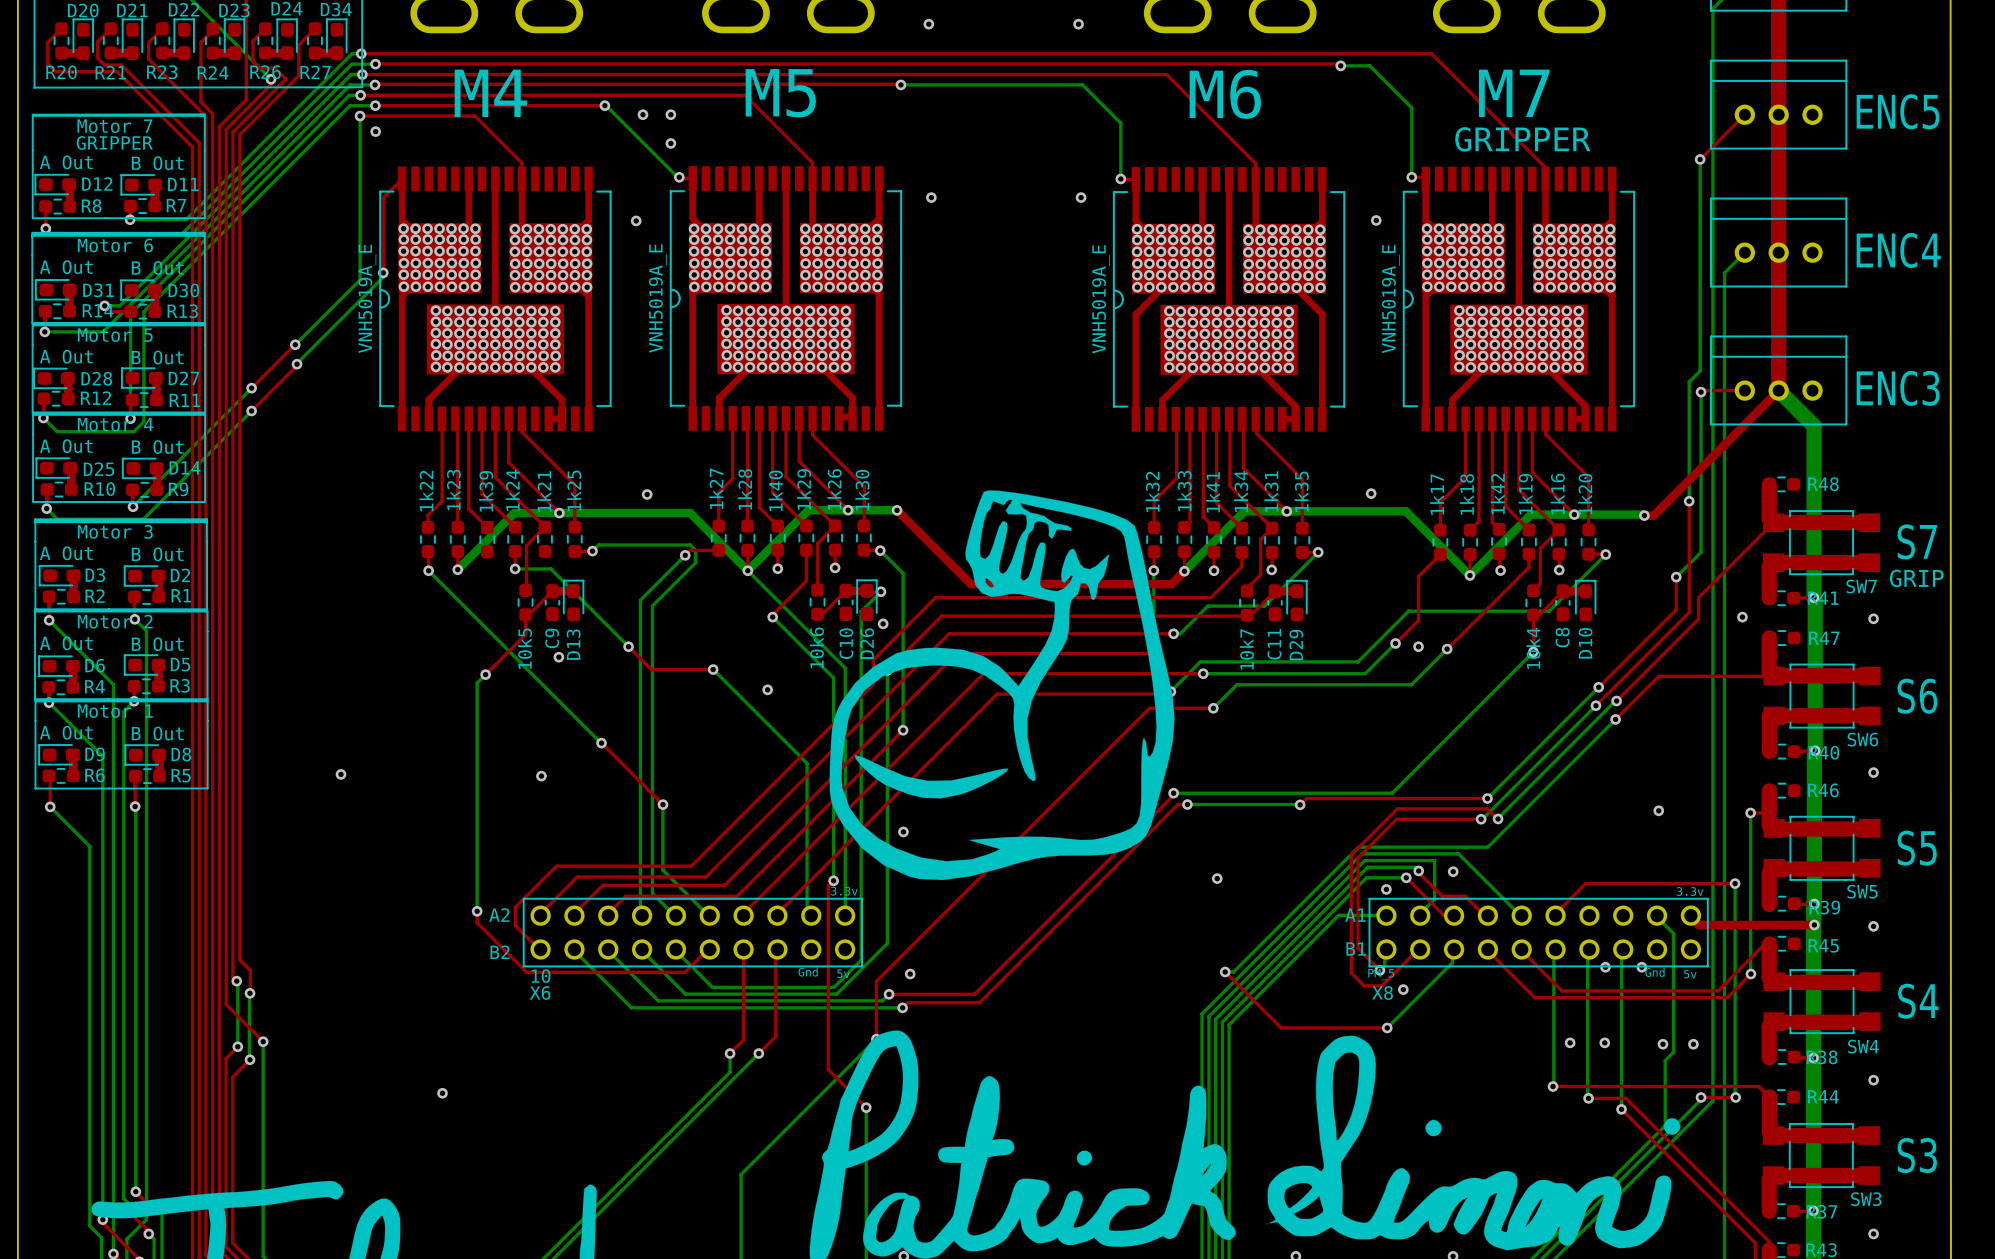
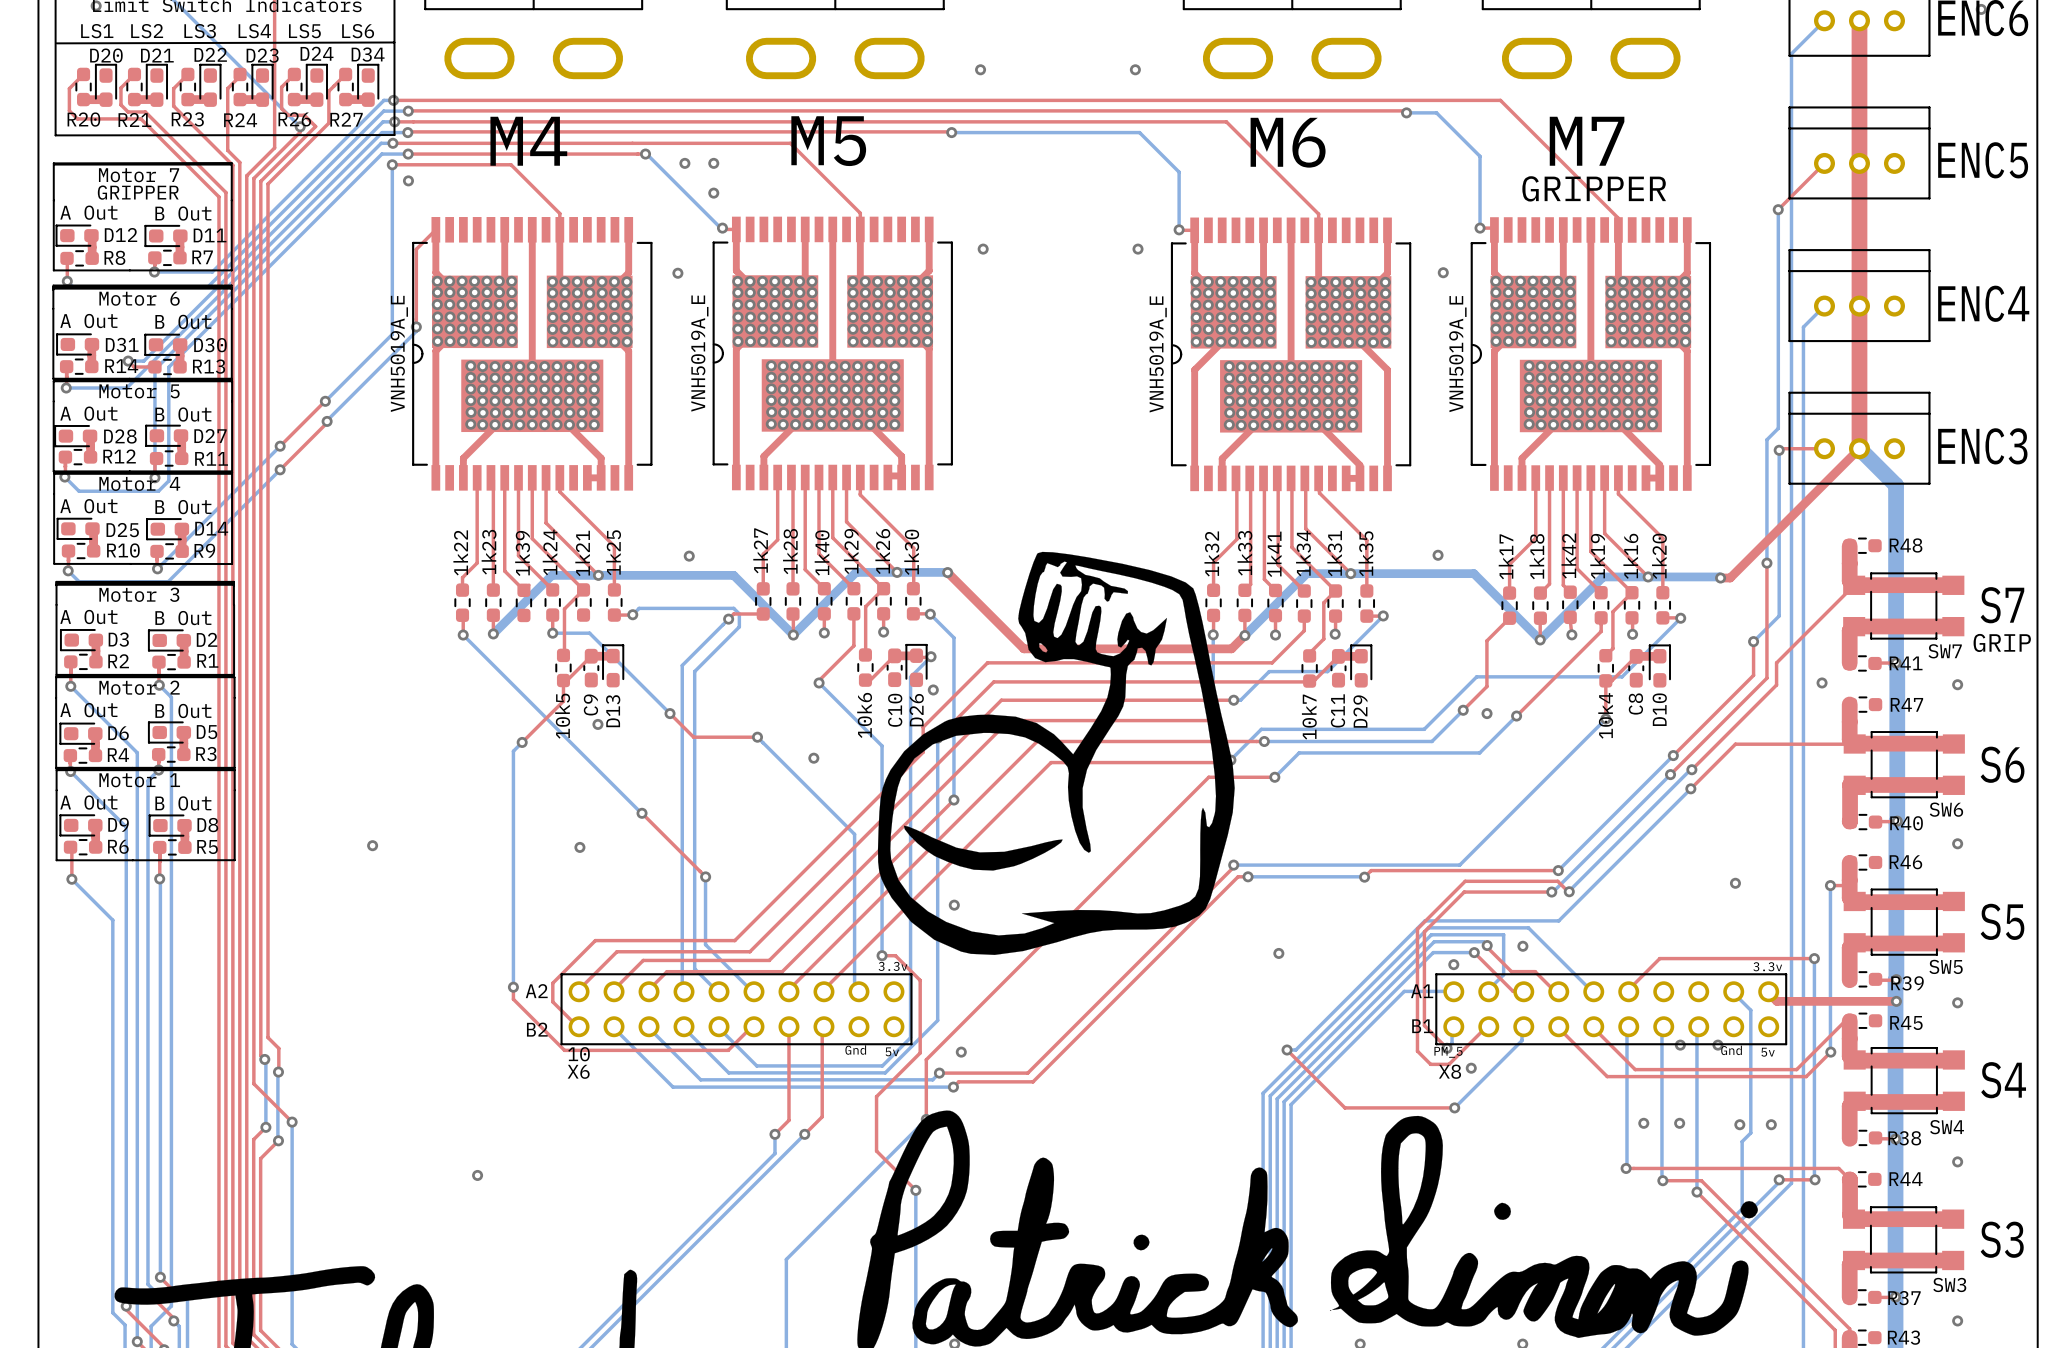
bottom track: (747, 570) (845, 668) (845, 913) (843, 915) -> none
top track: (833, 880) (828, 886) (828, 1017) -> (882, 955) (895, 955) (920, 980) (920, 1052) (876, 1096)

